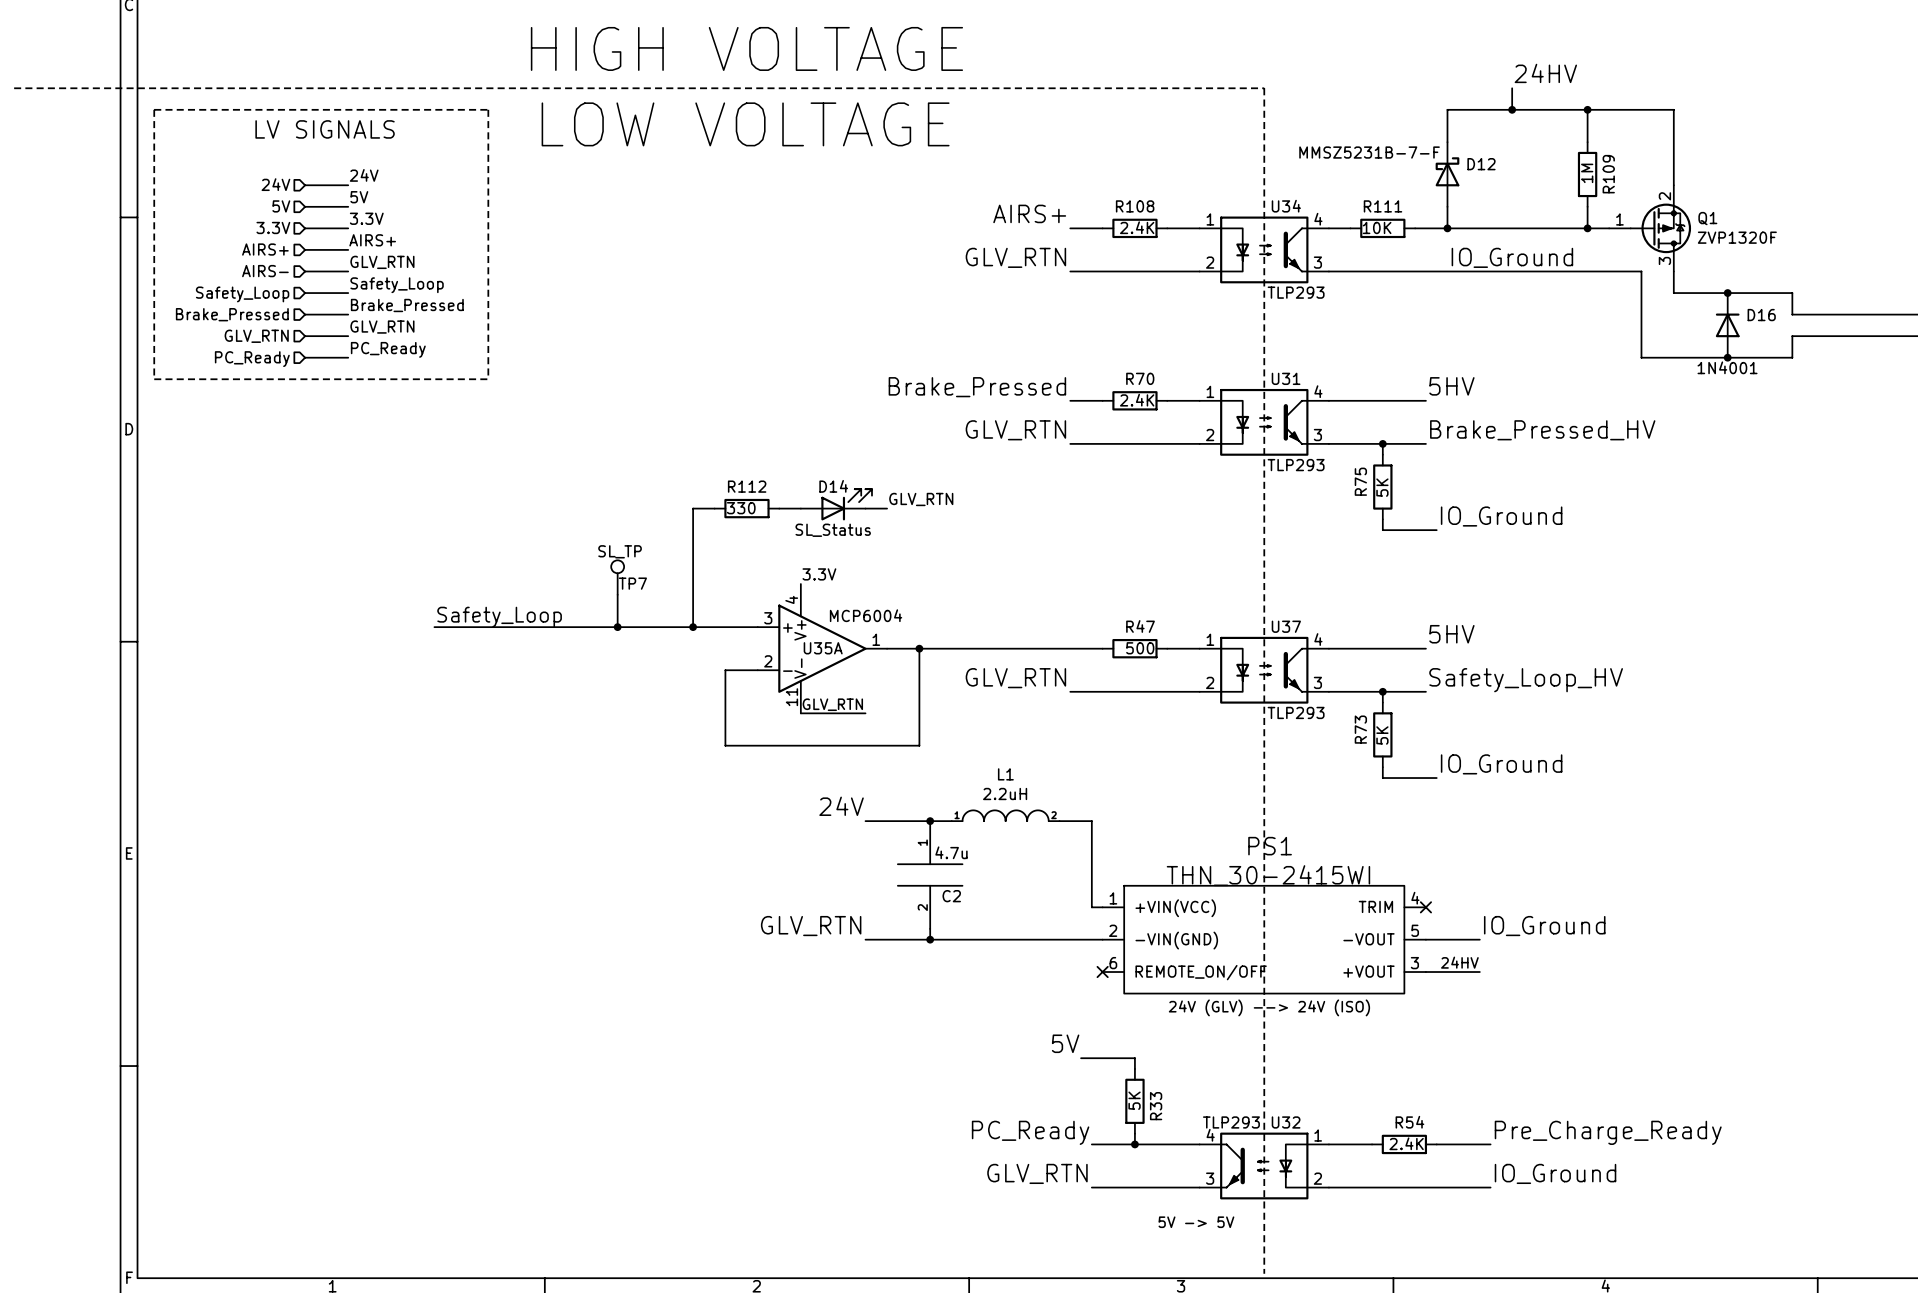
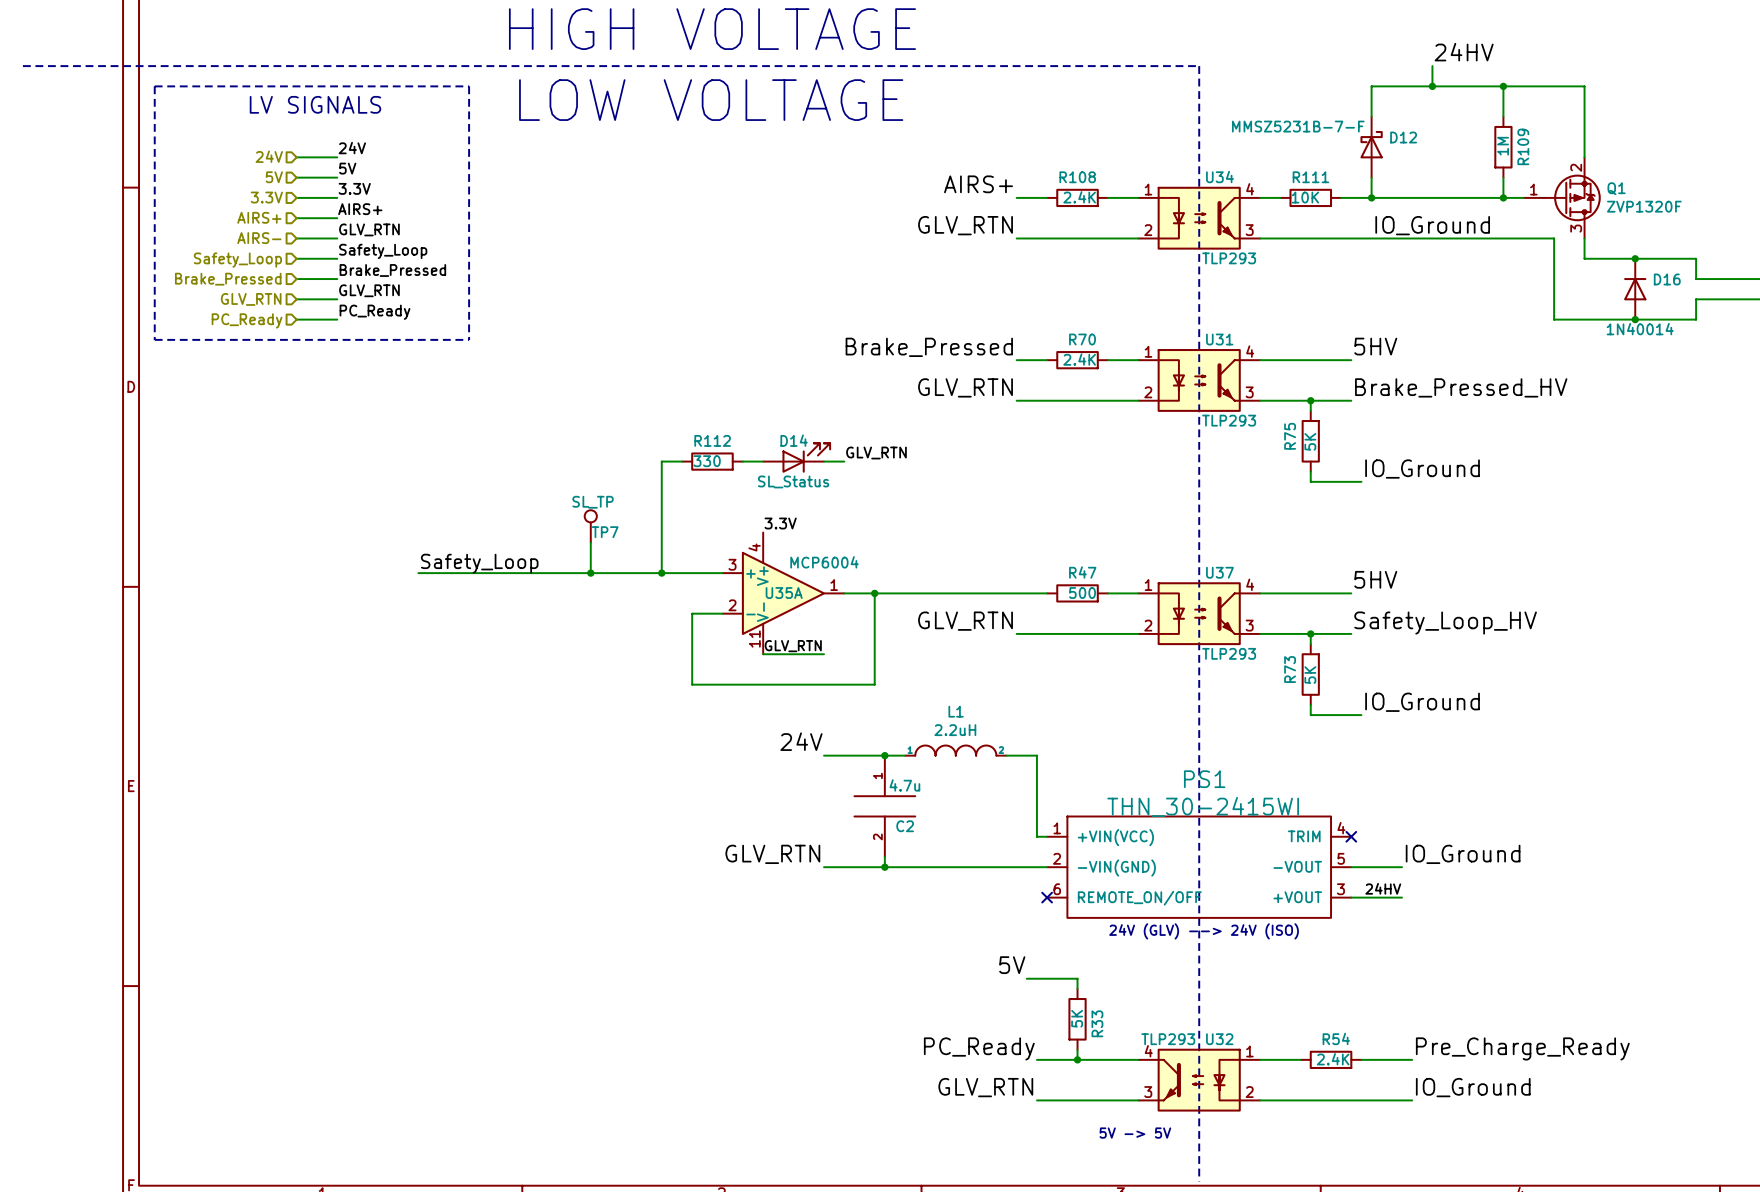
D16 value: 1N4001 (1727, 367) -> 1N40014 (1640, 329)

